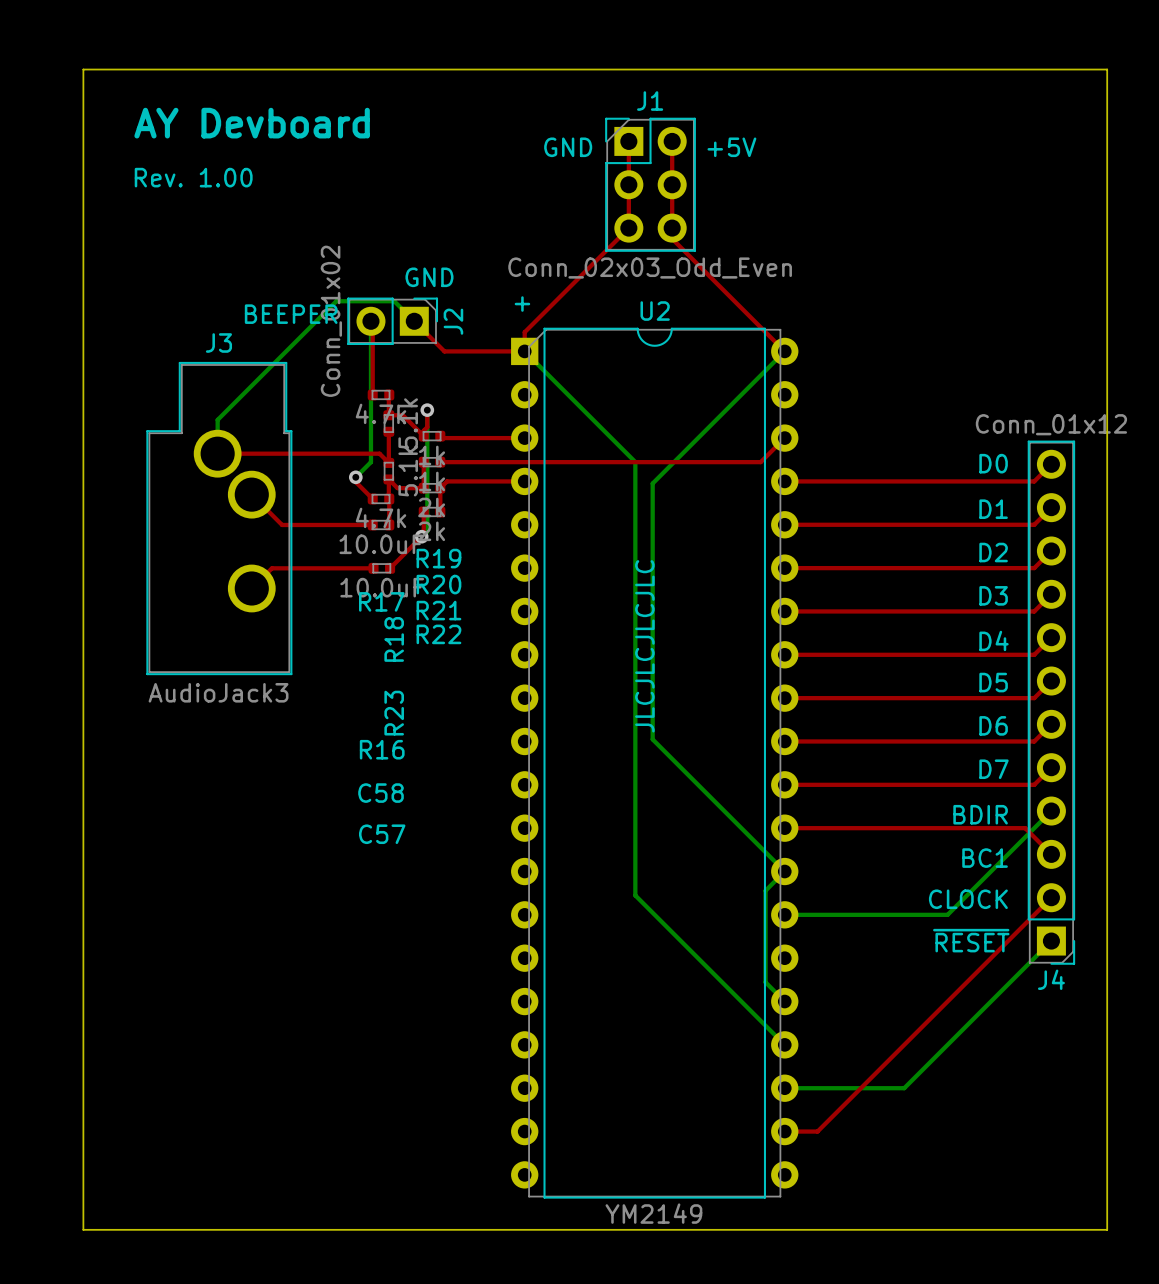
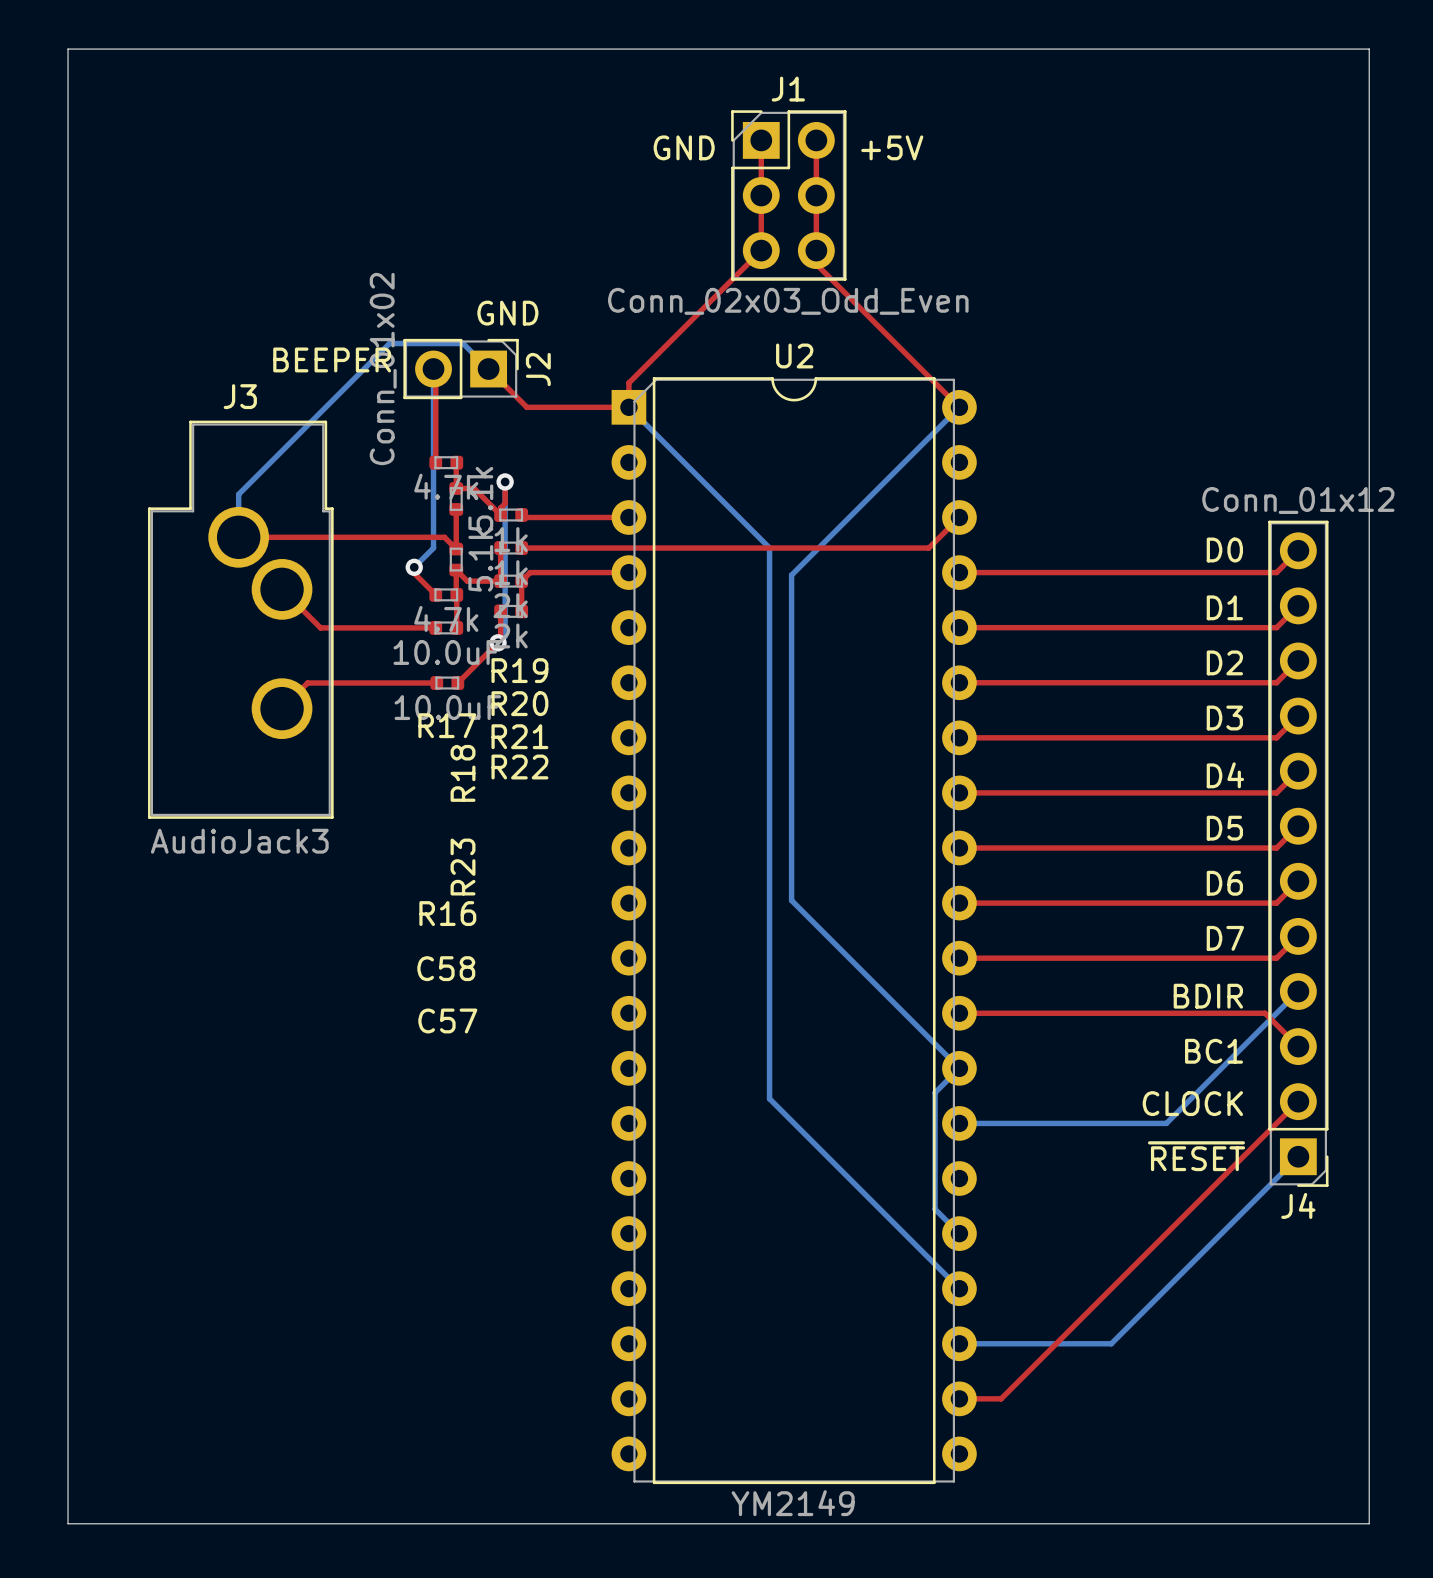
text: AY Devboard (252, 123) -> none
text: Rev. 1.00 (193, 177) -> none
text: + (522, 304) -> none
text: JLCJLCJLCJLC (644, 646) -> none

